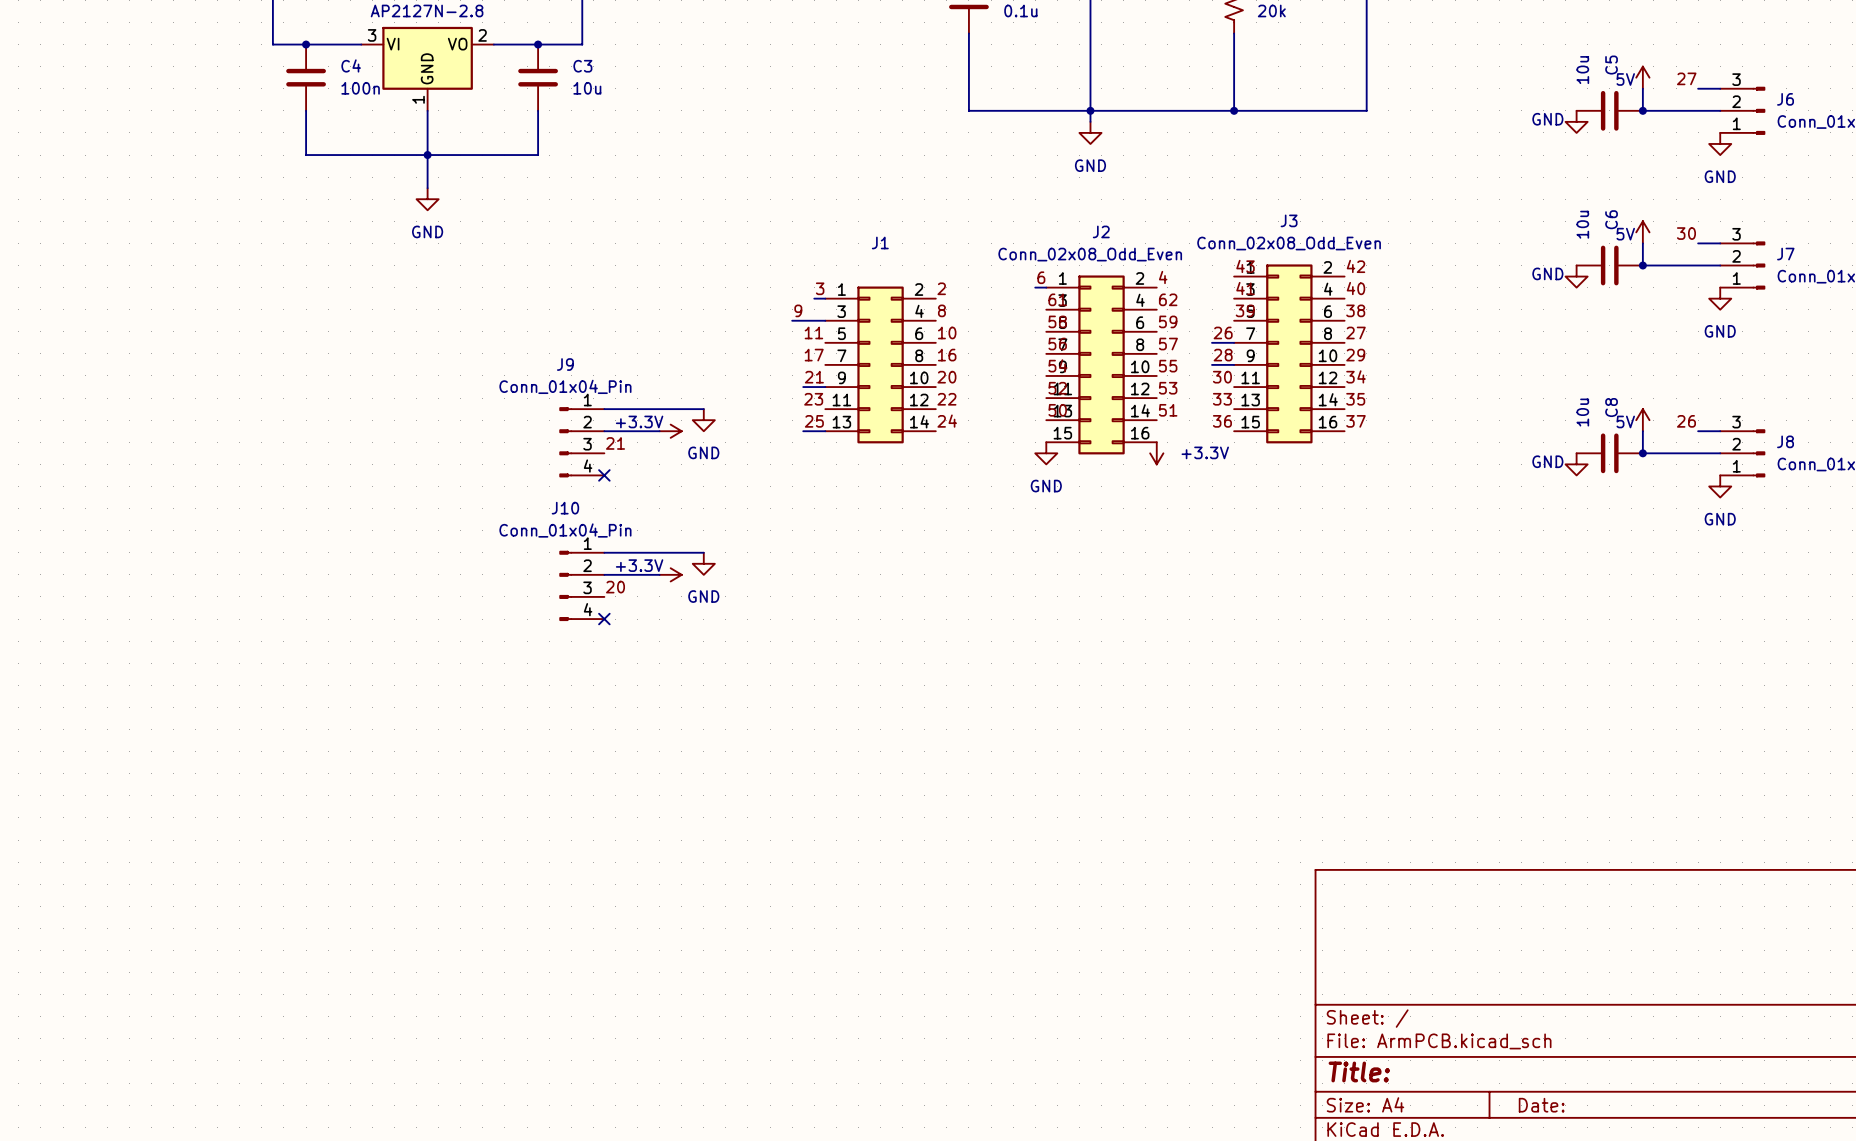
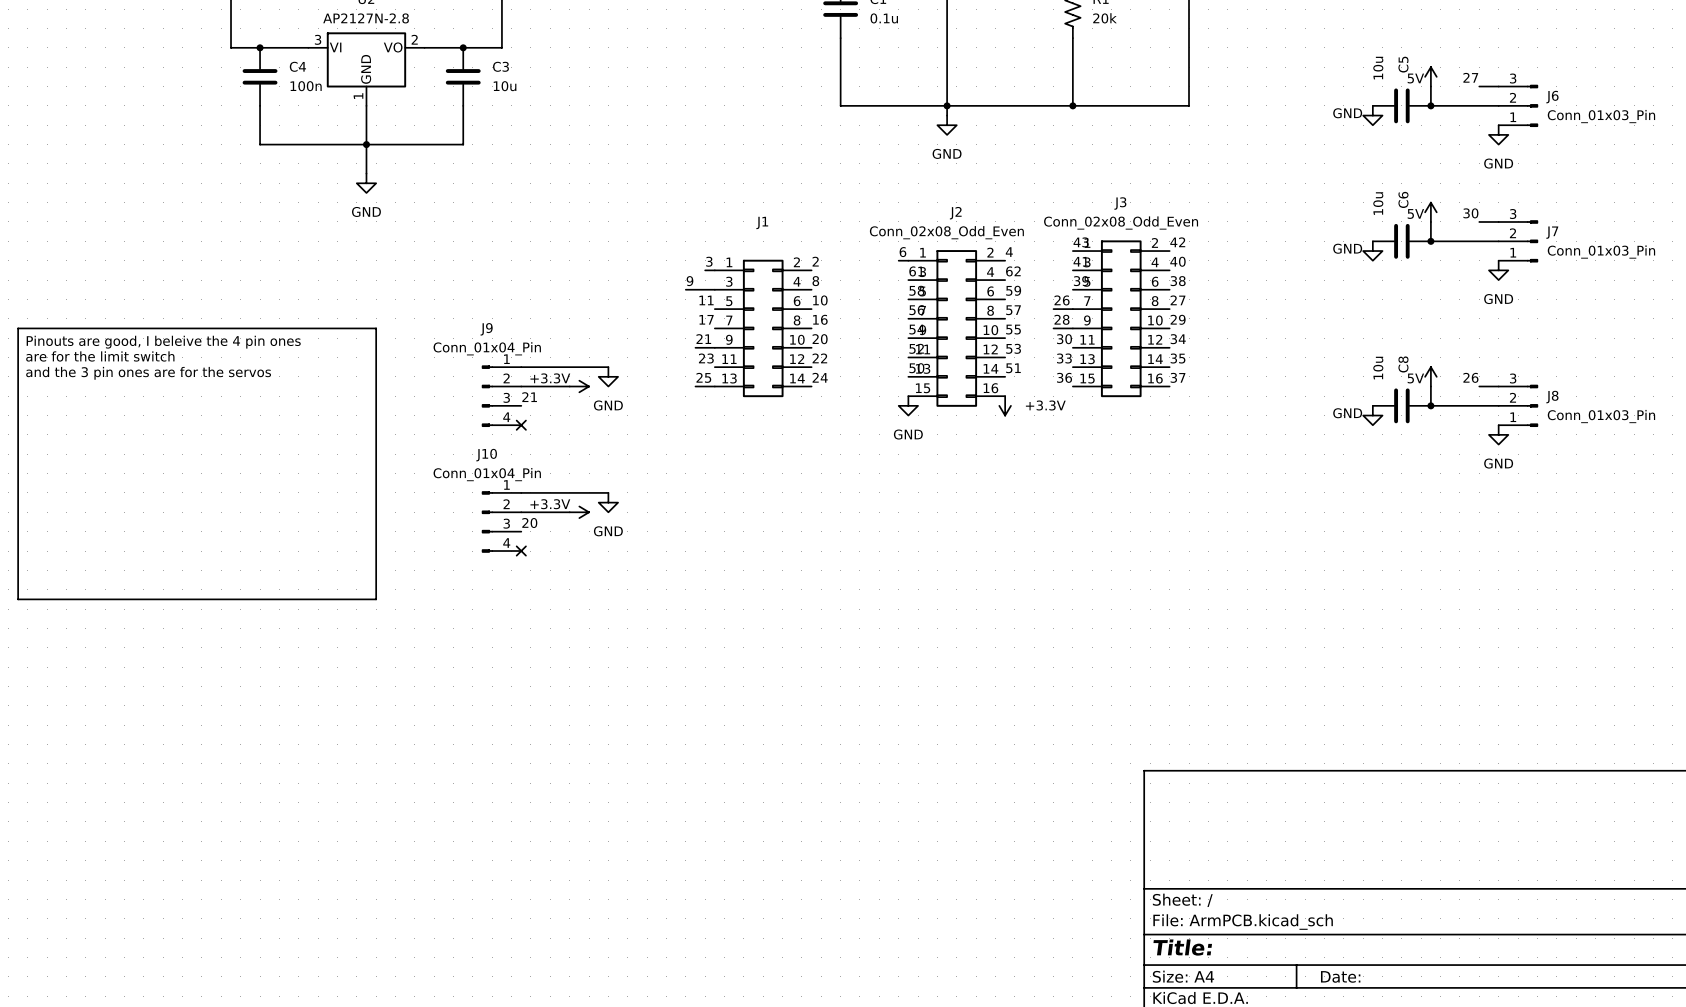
line: none -> (18, 328) (376, 328) (376, 599) (18, 599) (18, 328)
text: none -> Pinouts are good, I beleive the 4 pin ones (163, 342)
text: none -> are for the limit switch (100, 356)
text: none -> and the 3 pin ones are for the servos (148, 373)

